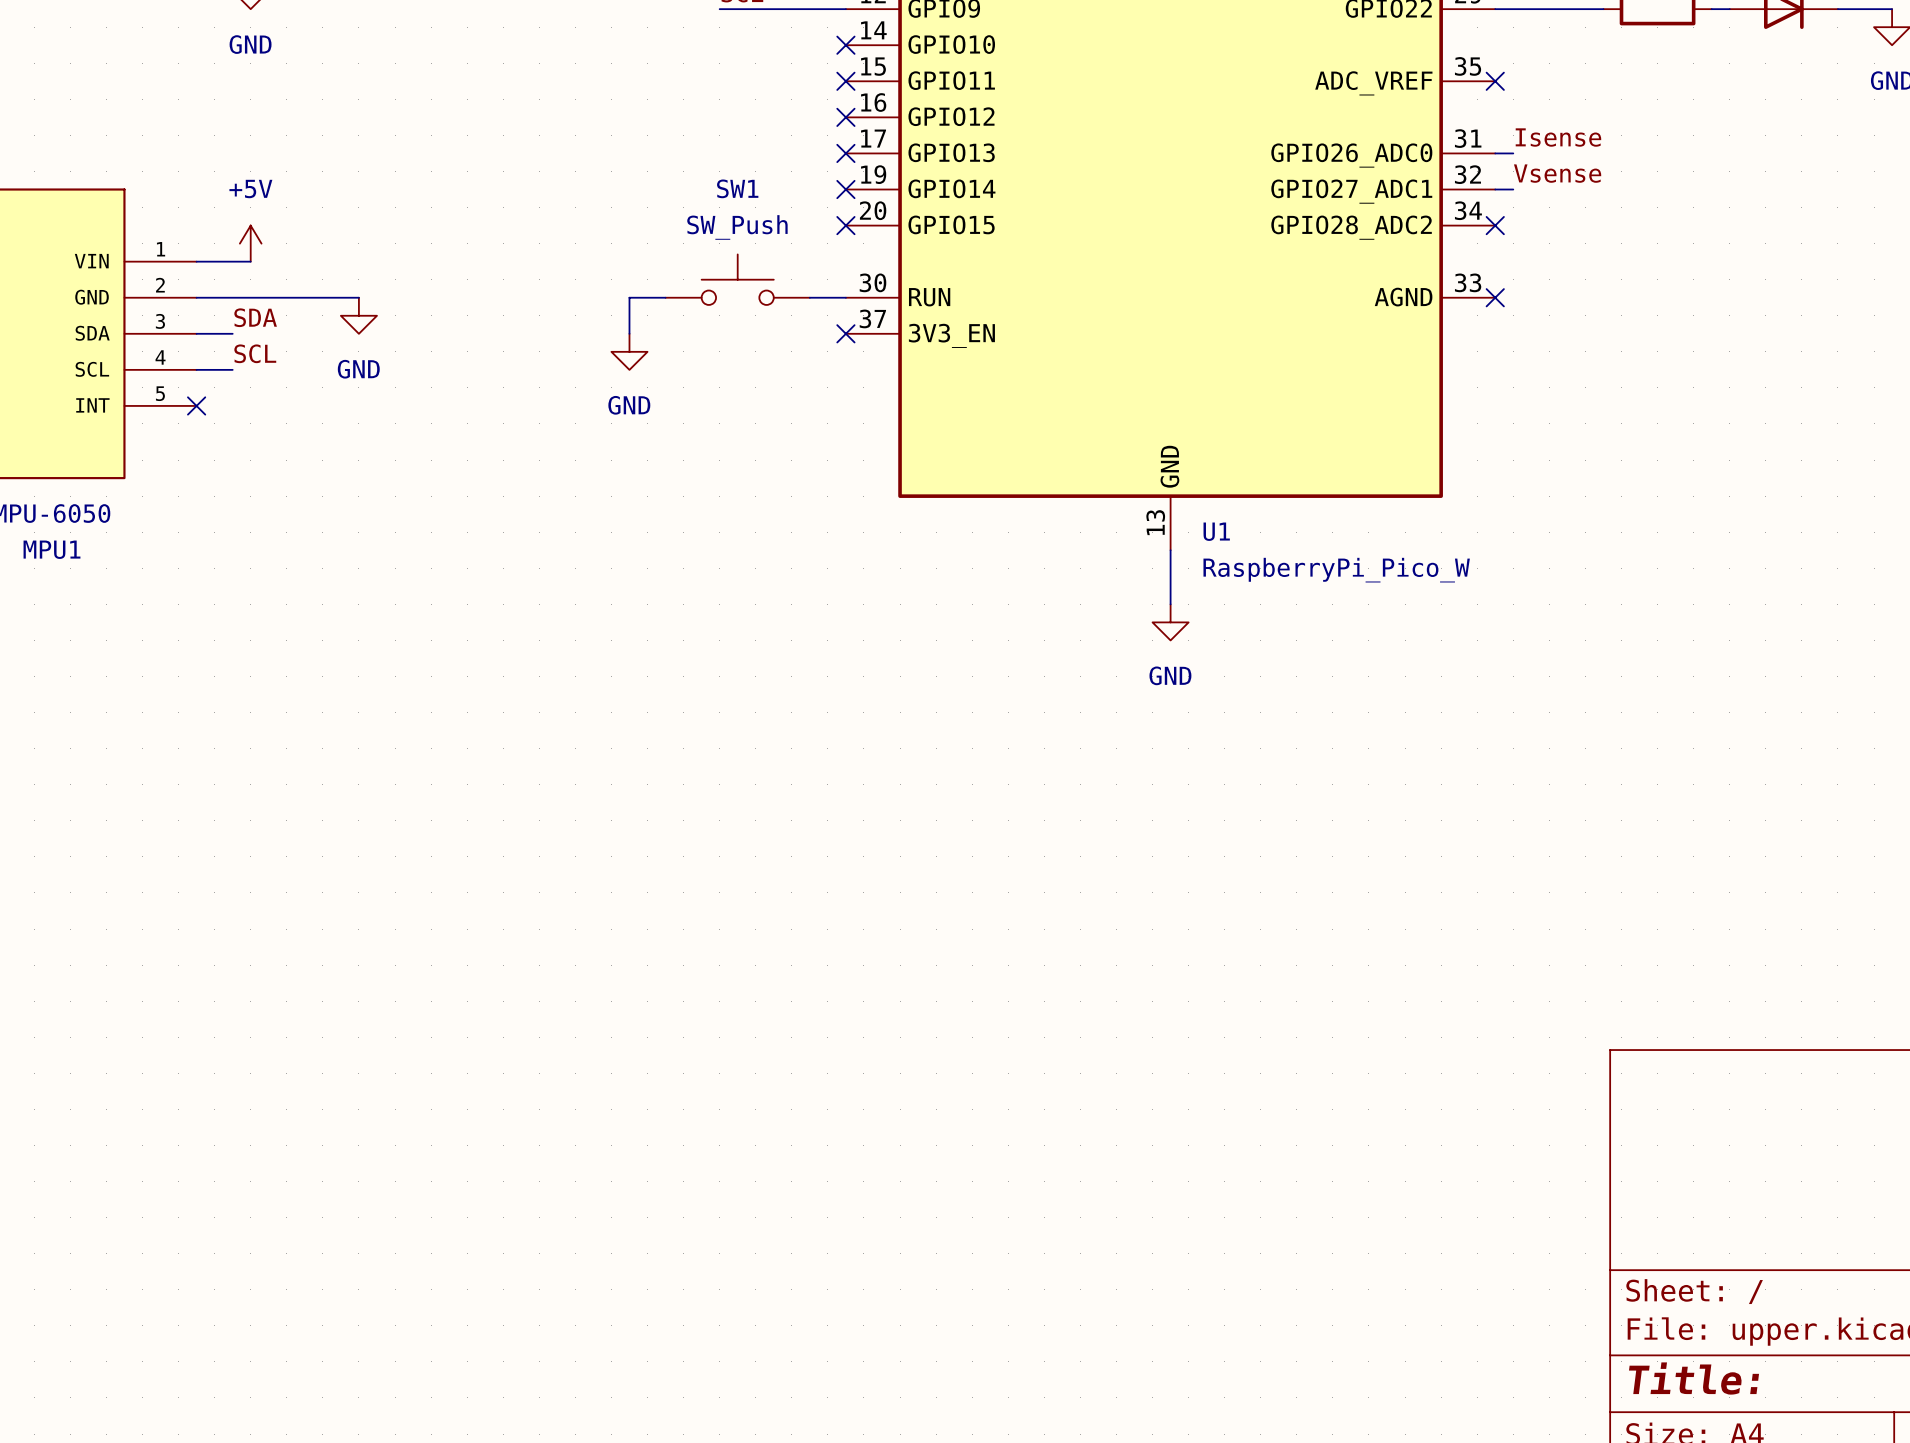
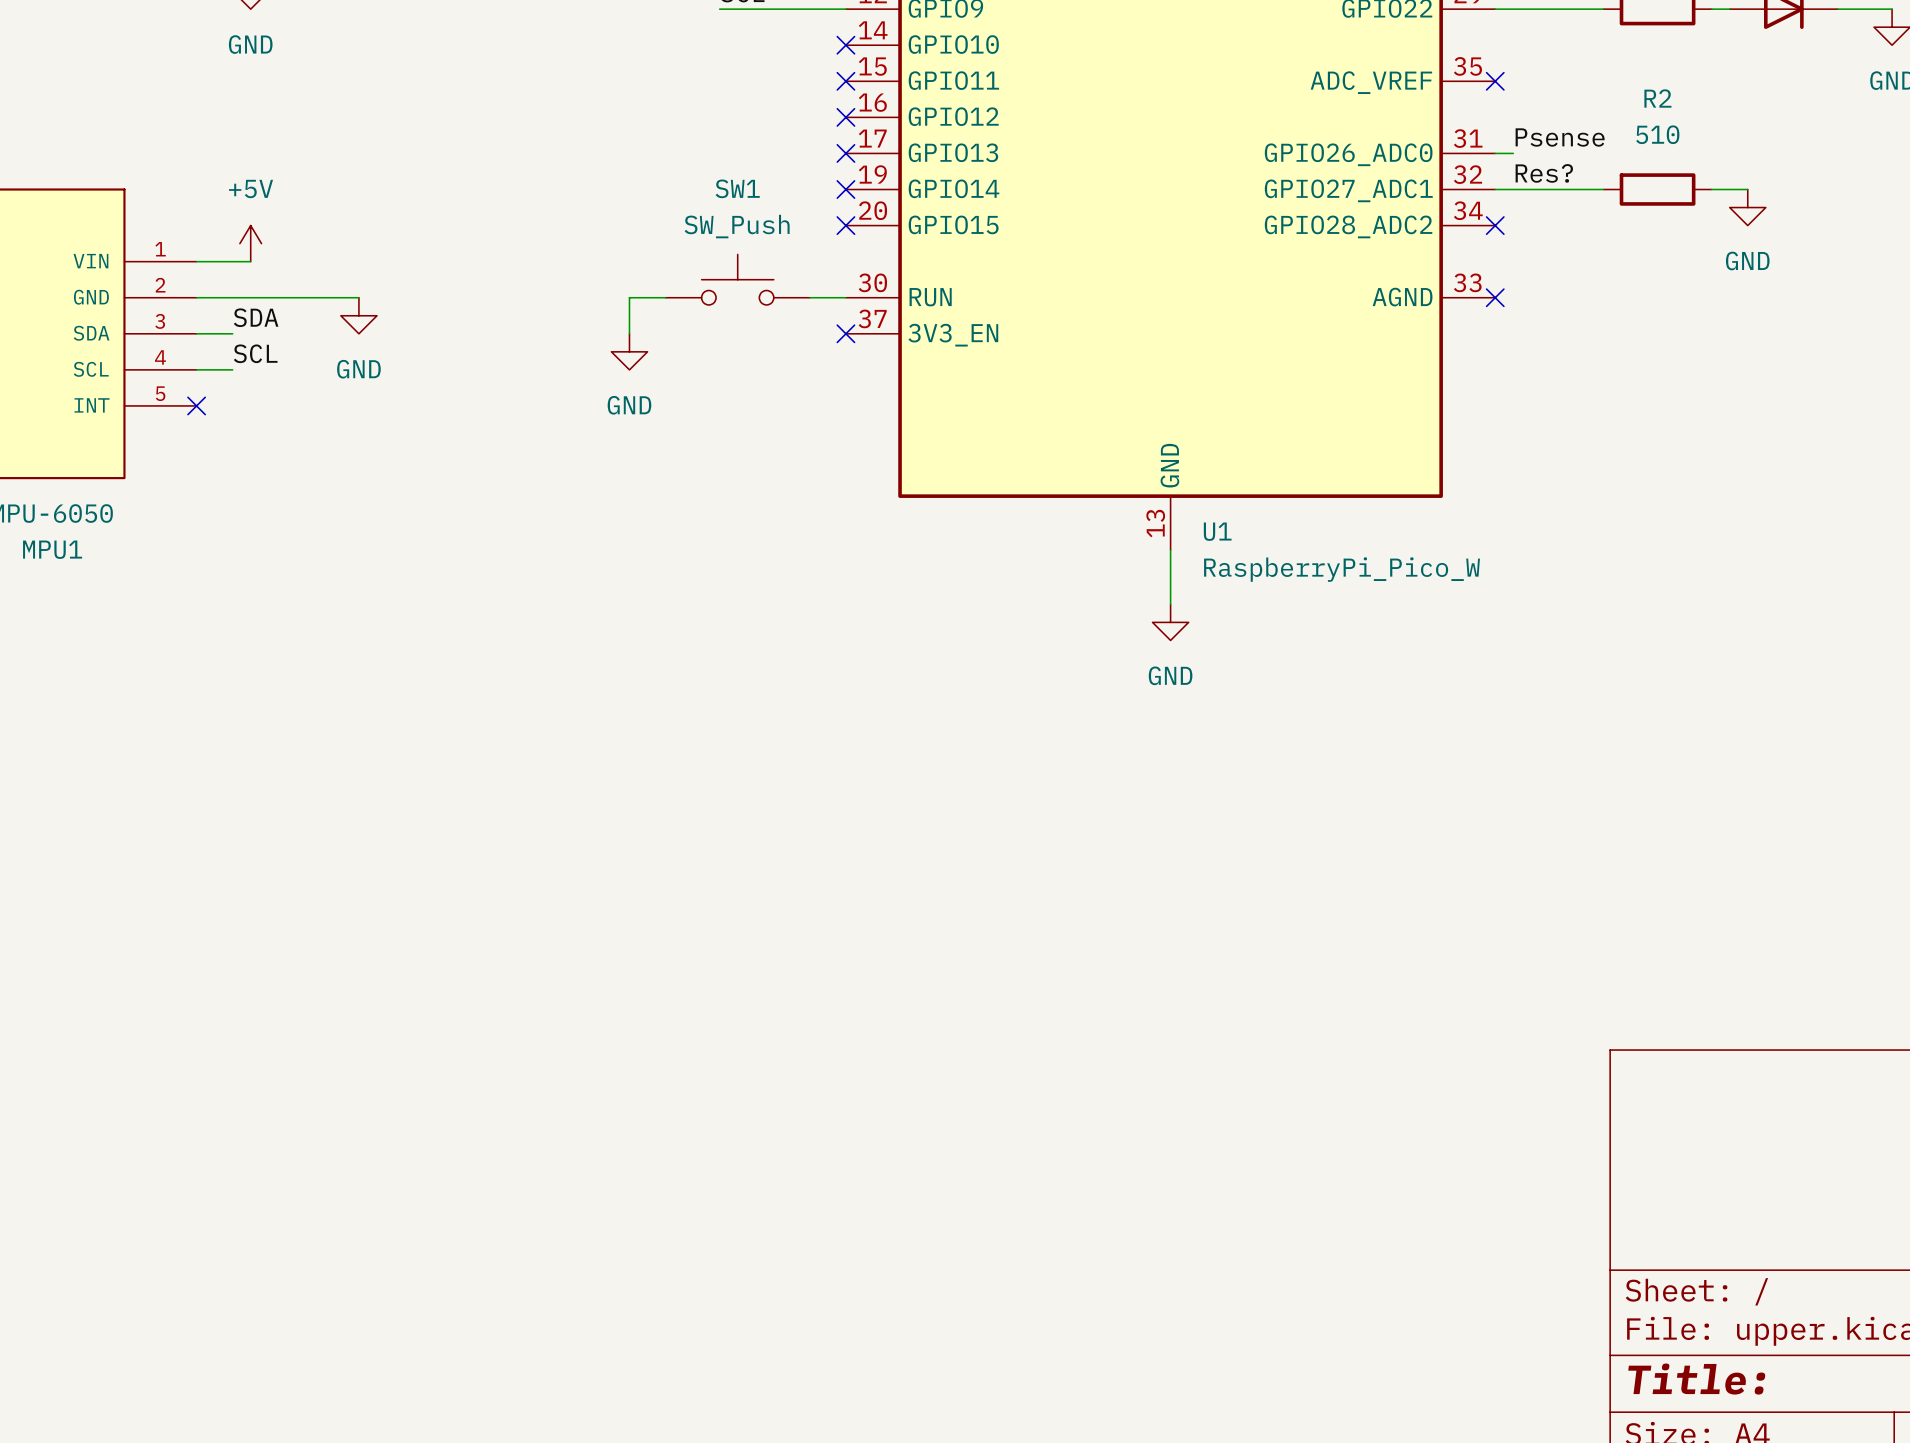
label: Isense (1558, 137) -> Psense (1560, 137)
label: Vsense (1557, 173) -> Res? (1544, 173)
wire: none -> (1513, 189) (1603, 189)
R2: none -> 510 (1657, 189)
wire: none -> (1711, 189) (1747, 189)
power symbol: none -> GND (1747, 207)

